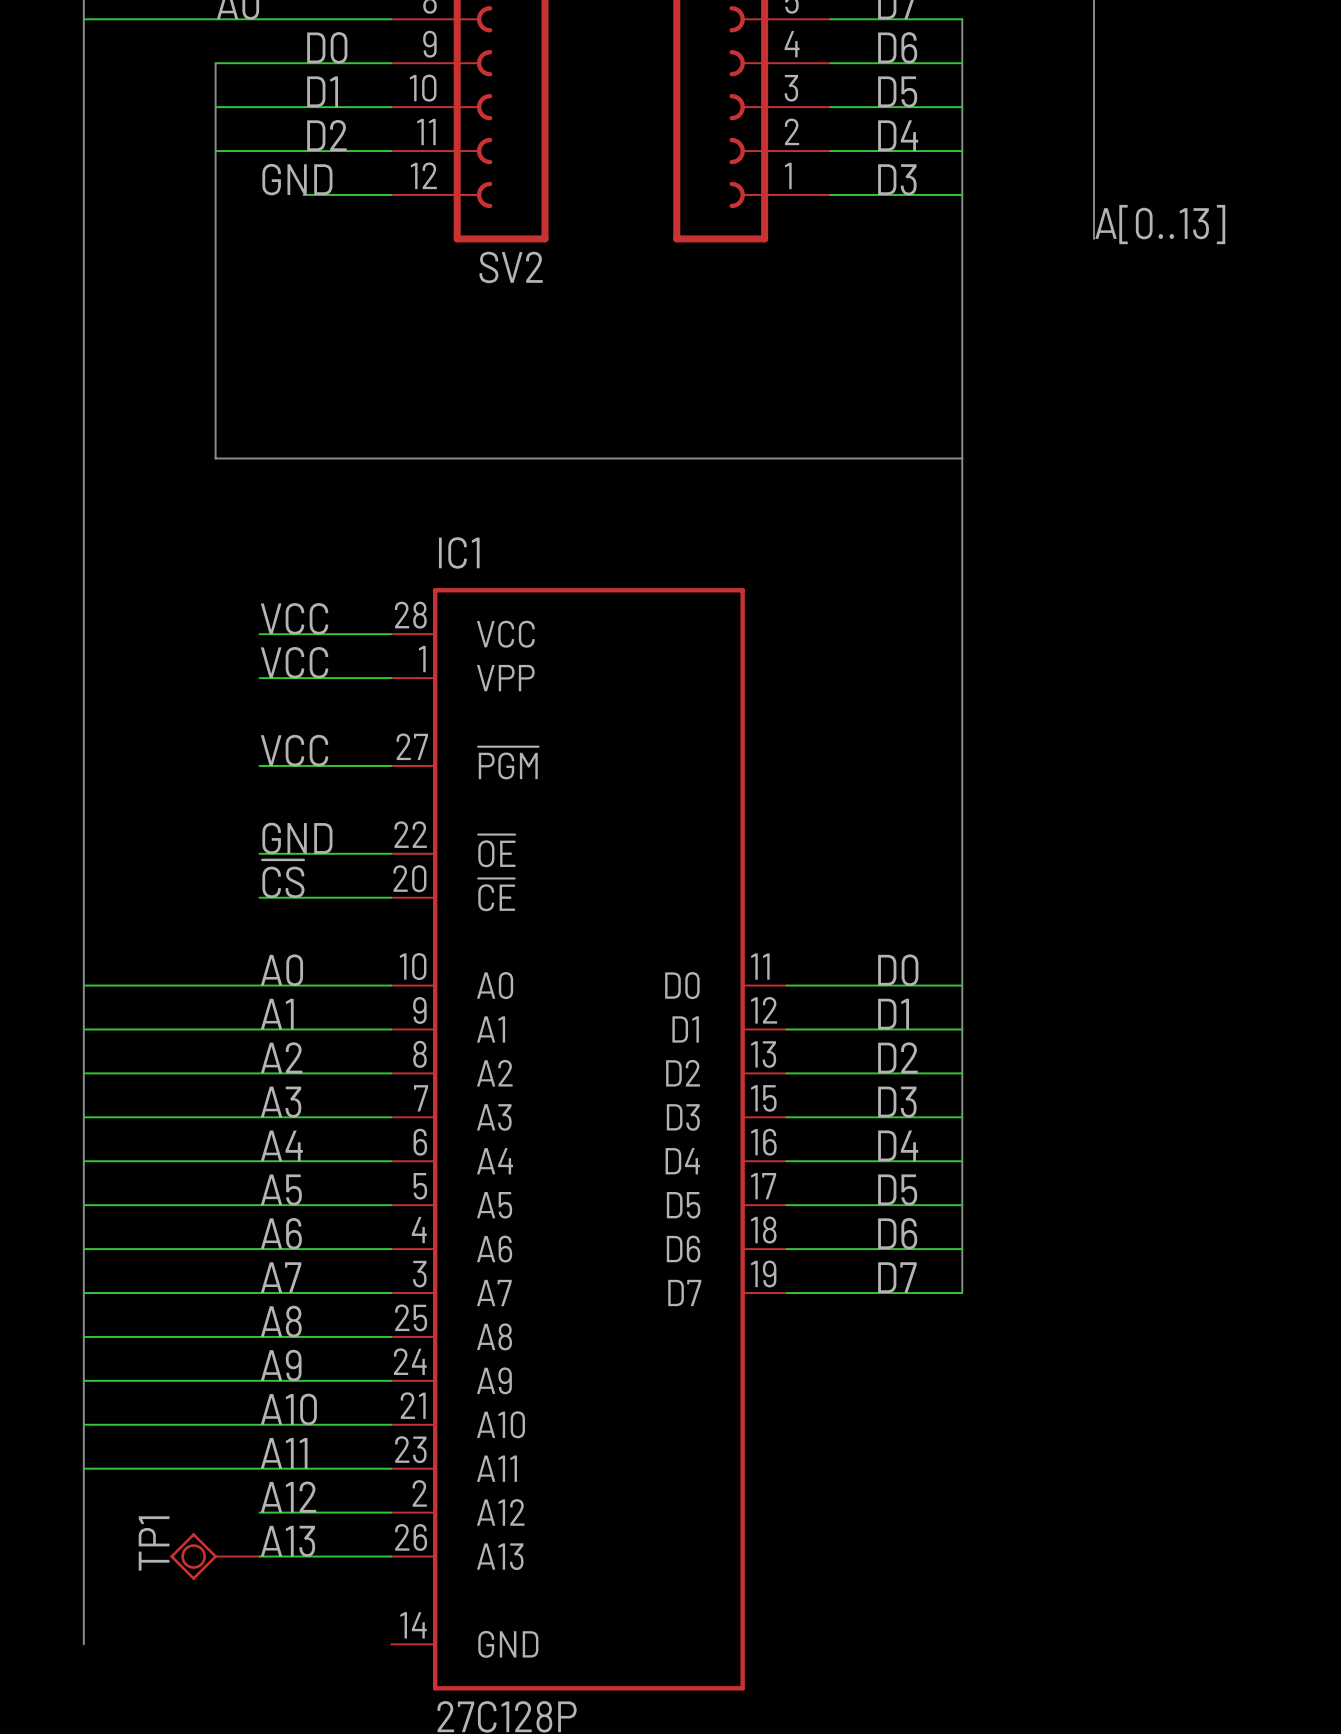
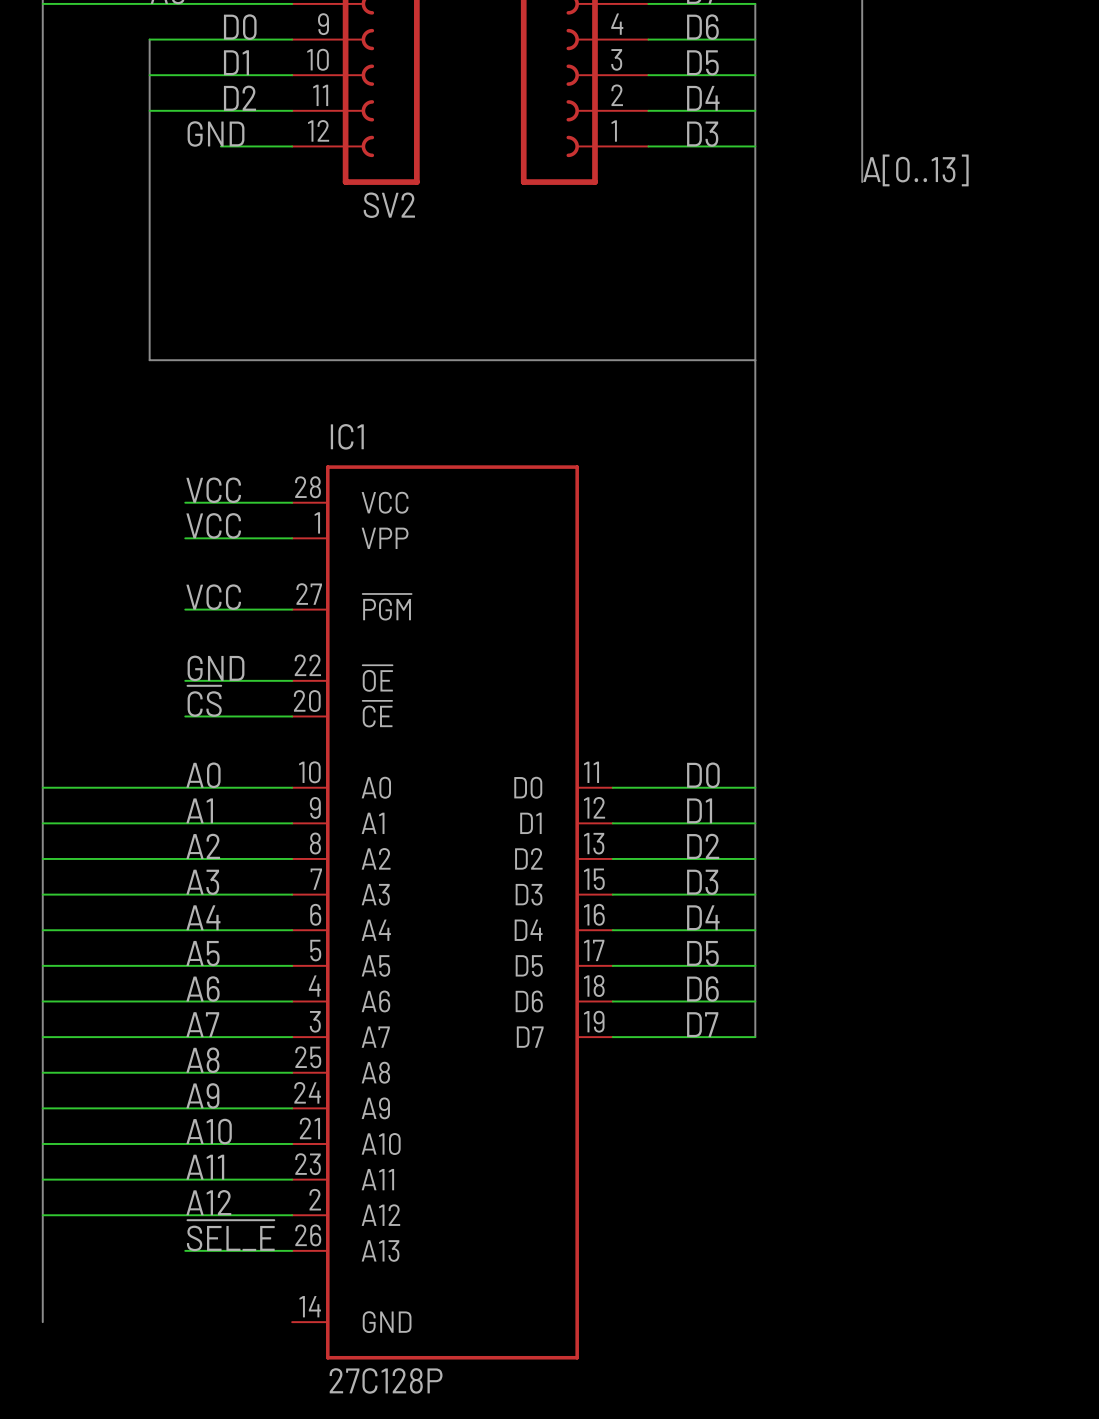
wire: none -> (42, 1215) (185, 1215)
label: A13 (287, 1541) -> ~{SEL_E} (230, 1235)
TP1: (214, 1556) -> none

